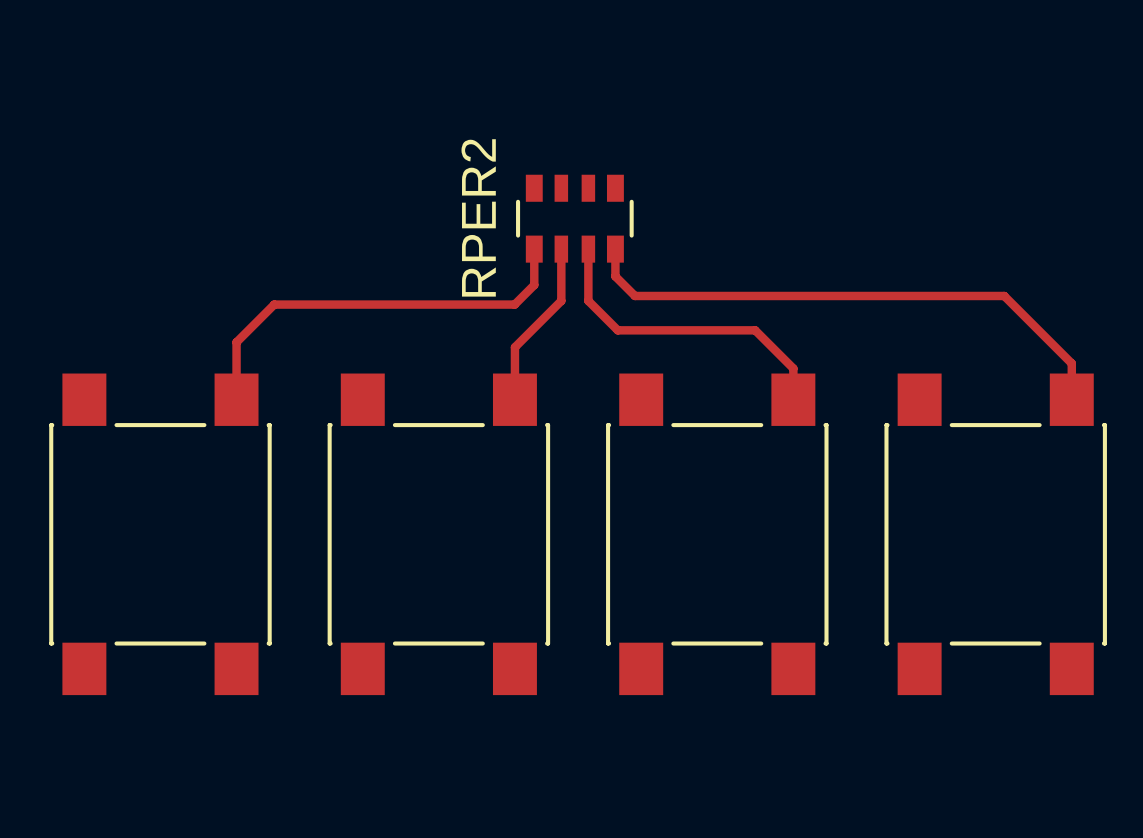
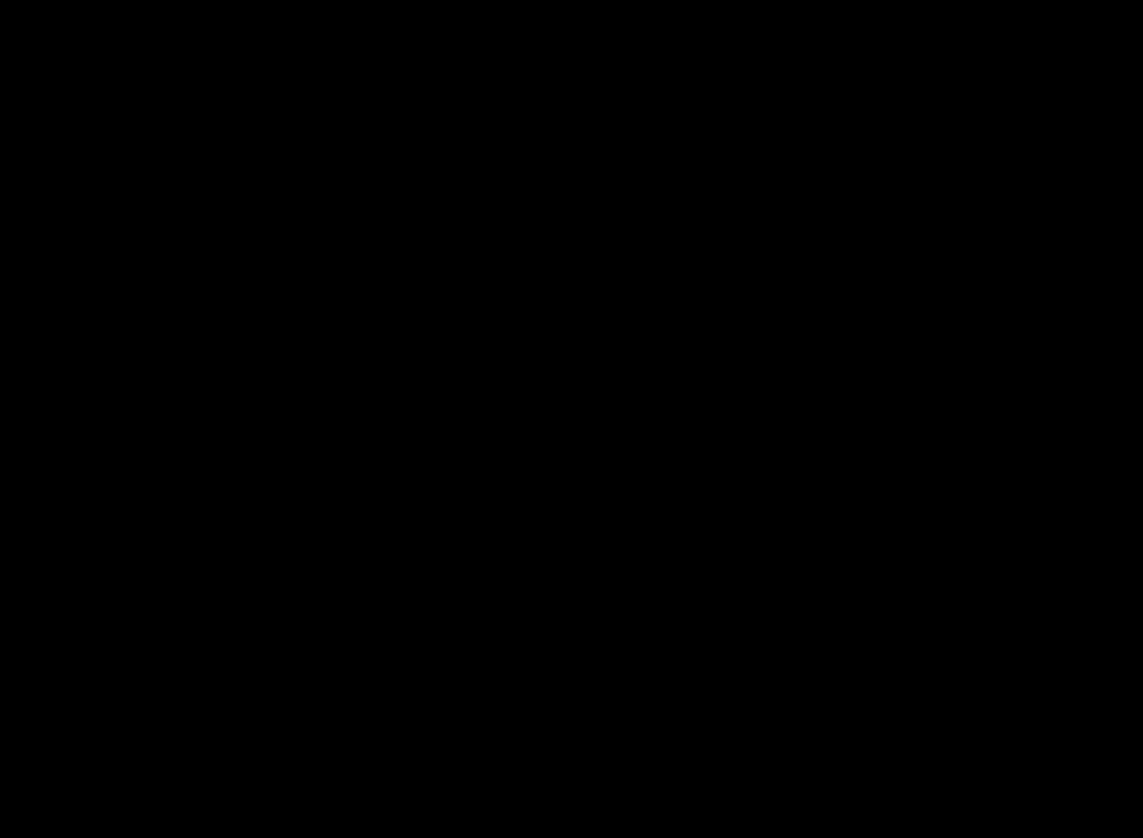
RPER2: (574, 218) -> none
track: (534, 249) (534, 285) (514, 304) (274, 304) (236, 342) (236, 399) -> none
track: (561, 249) (561, 300) (514, 347) (514, 399) -> none
track: (588, 249) (588, 300) (617, 330) (755, 330) (793, 368) (793, 399) -> none
track: (615, 249) (615, 276) (634, 295) (1004, 295) (1071, 363) (1071, 399) -> none
part: (160, 534) -> none
part: (438, 534) -> none
part: (717, 534) -> none
part: (995, 534) -> none

